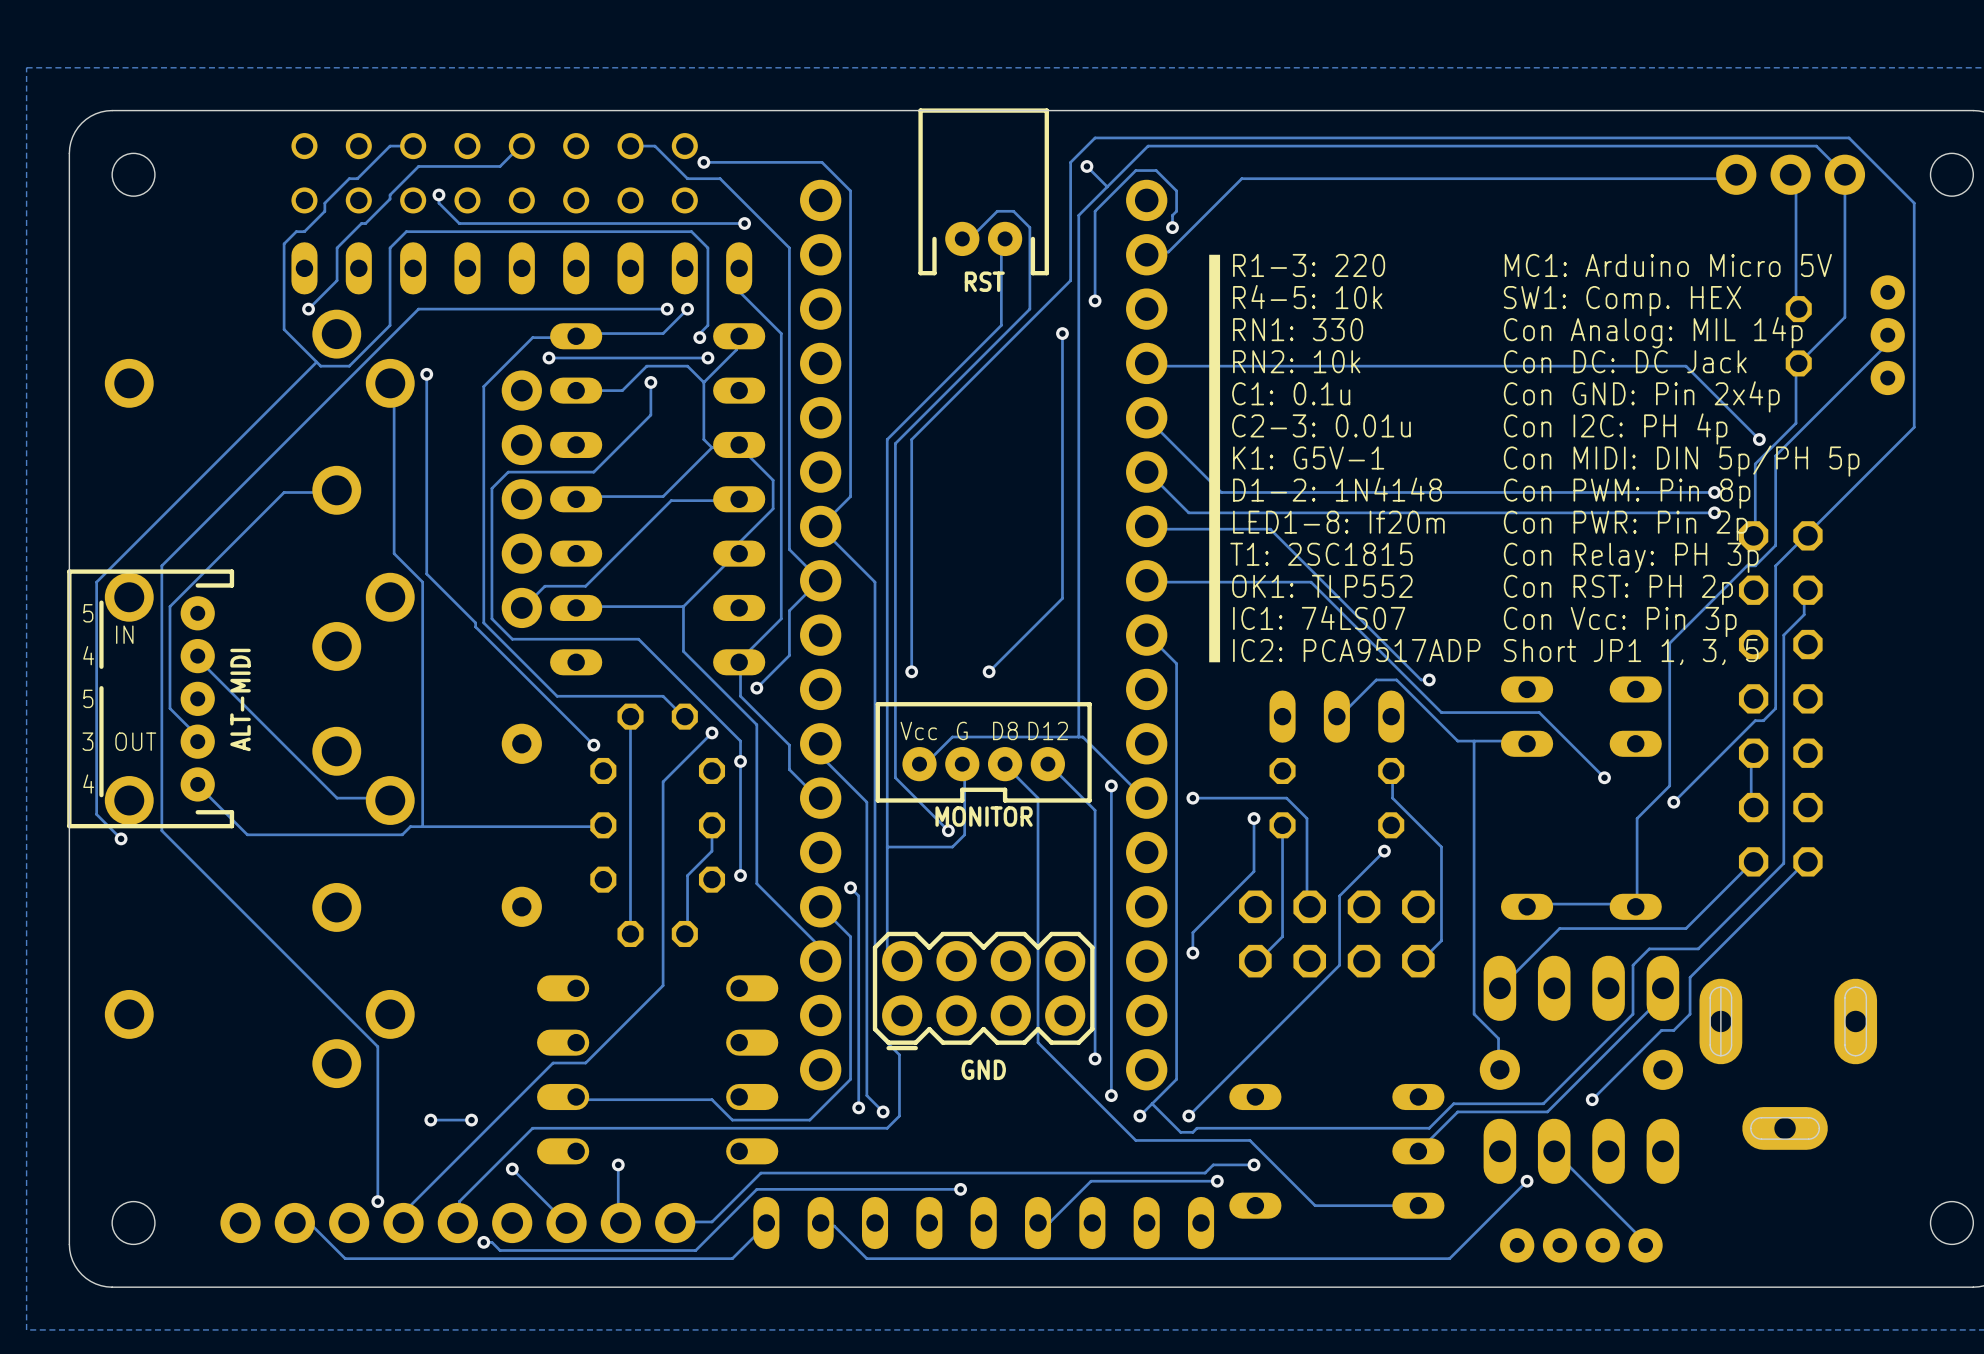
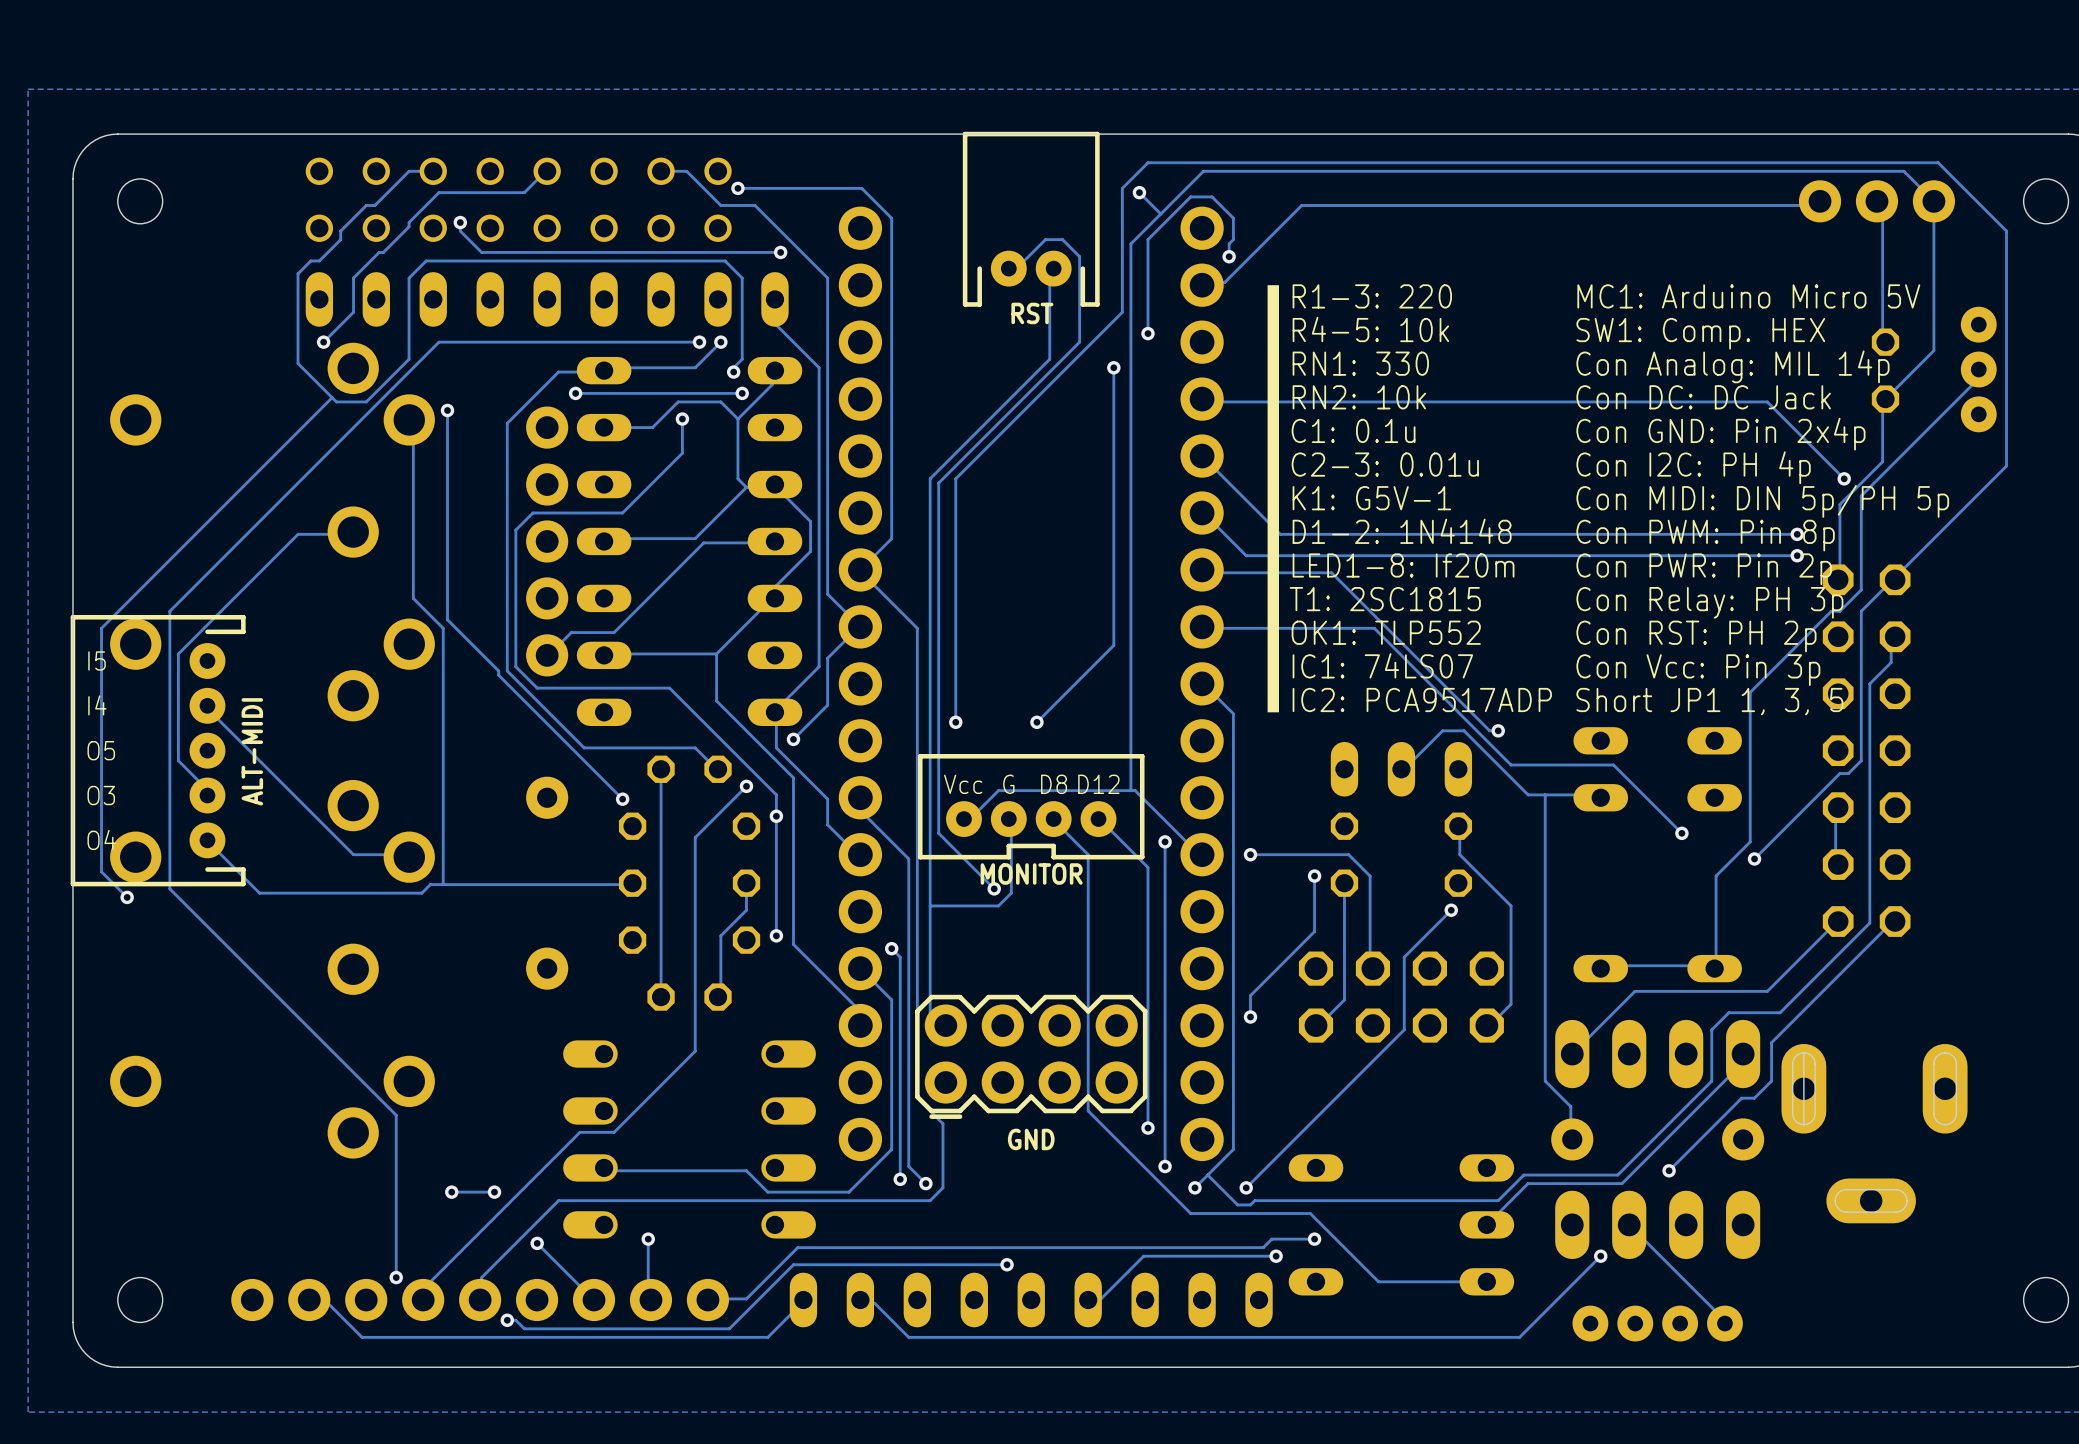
line: (101, 602) (101, 666) -> none
text: 5 (88, 613) -> I5 (97, 660)
text: IN (124, 634) -> none
text: 4 (88, 655) -> I4 (97, 705)
line: (101, 688) (101, 795) -> none
text: 5 (88, 698) -> O5 (101, 750)
text: 3 (87, 741) -> O3 (101, 795)
text: OUT (135, 741) -> none
text: 4 (88, 784) -> O4 (101, 839)

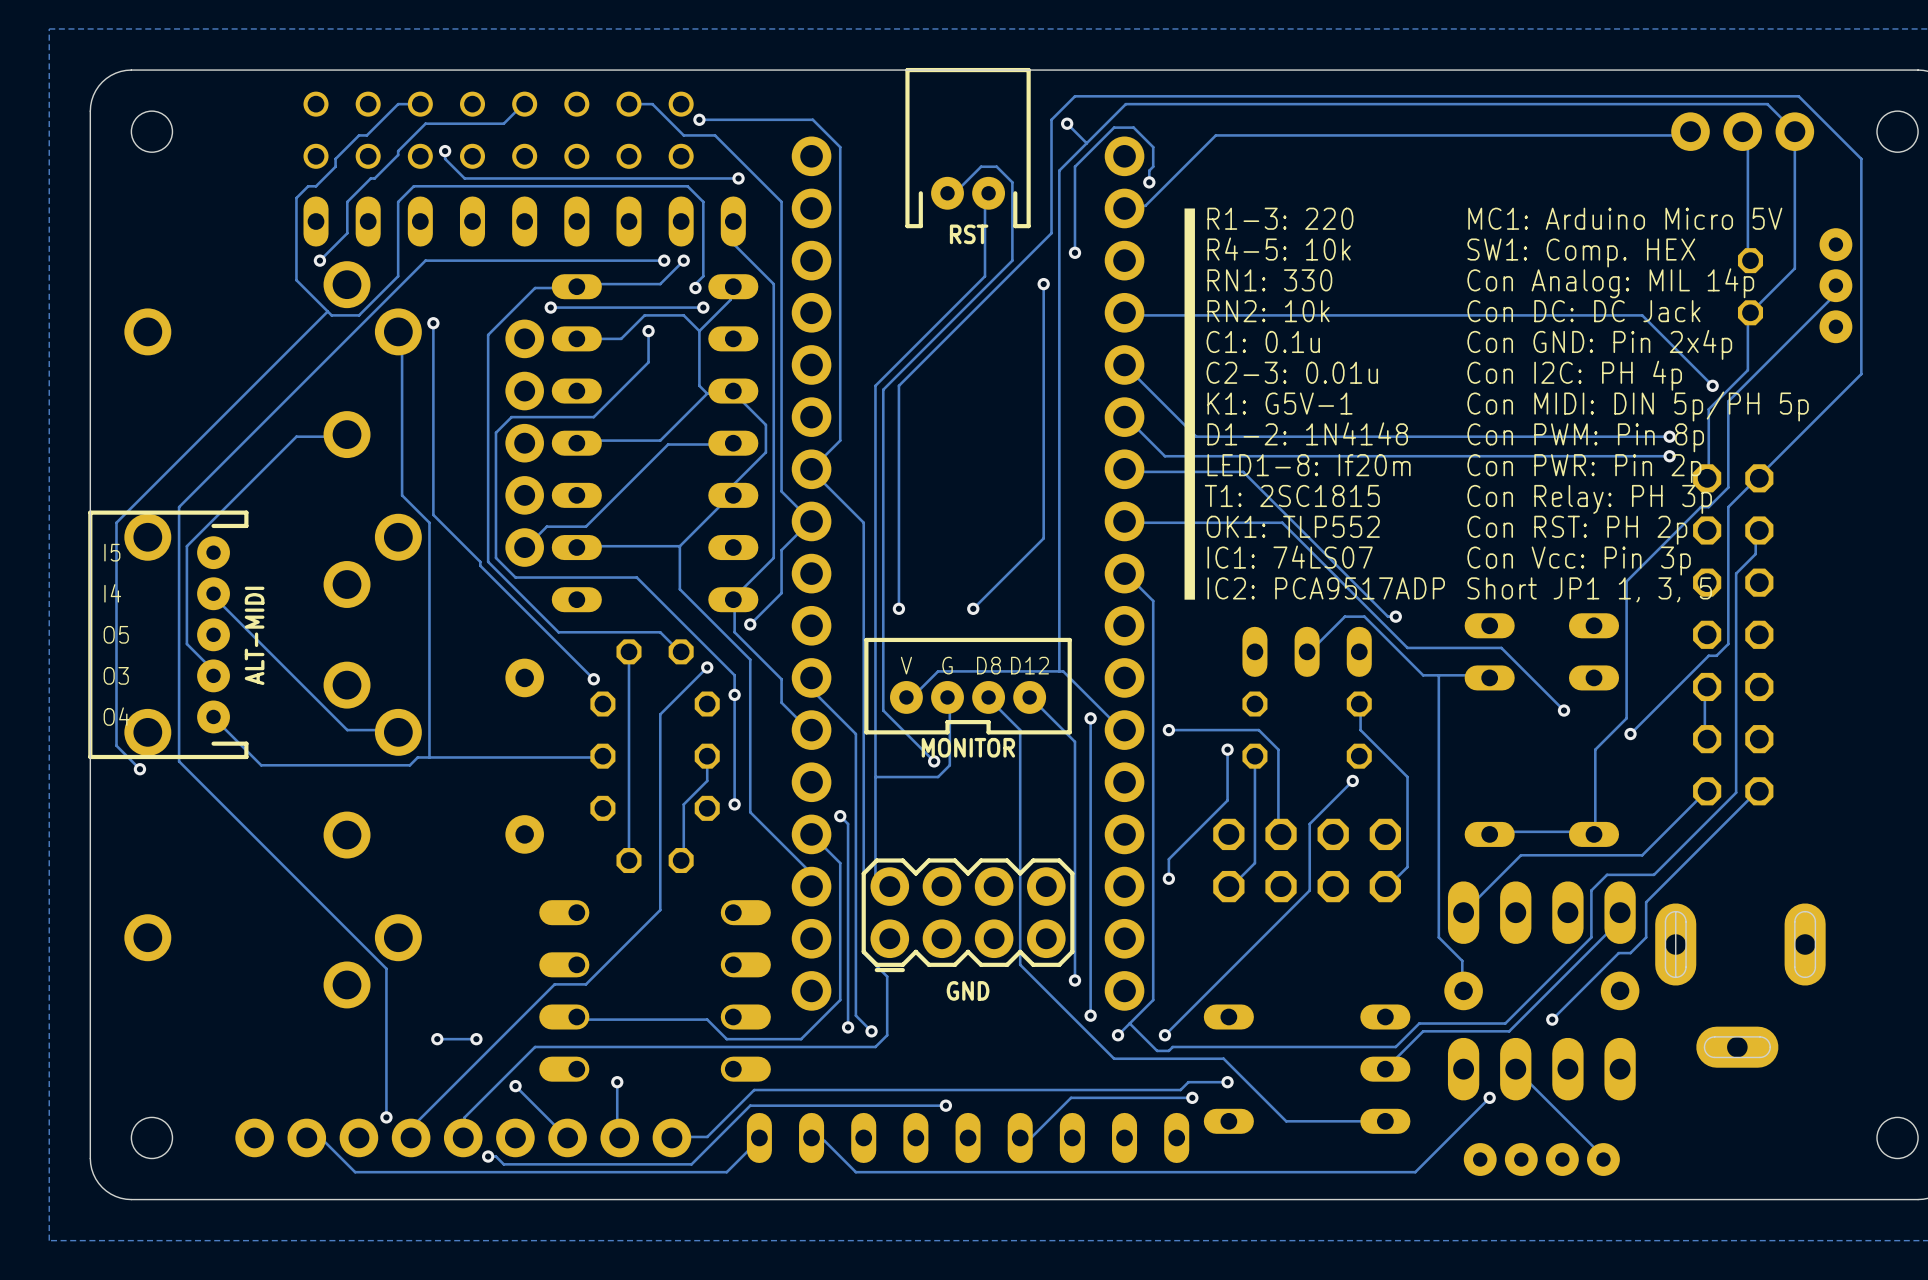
text: Vcc (963, 784) -> V (906, 665)

